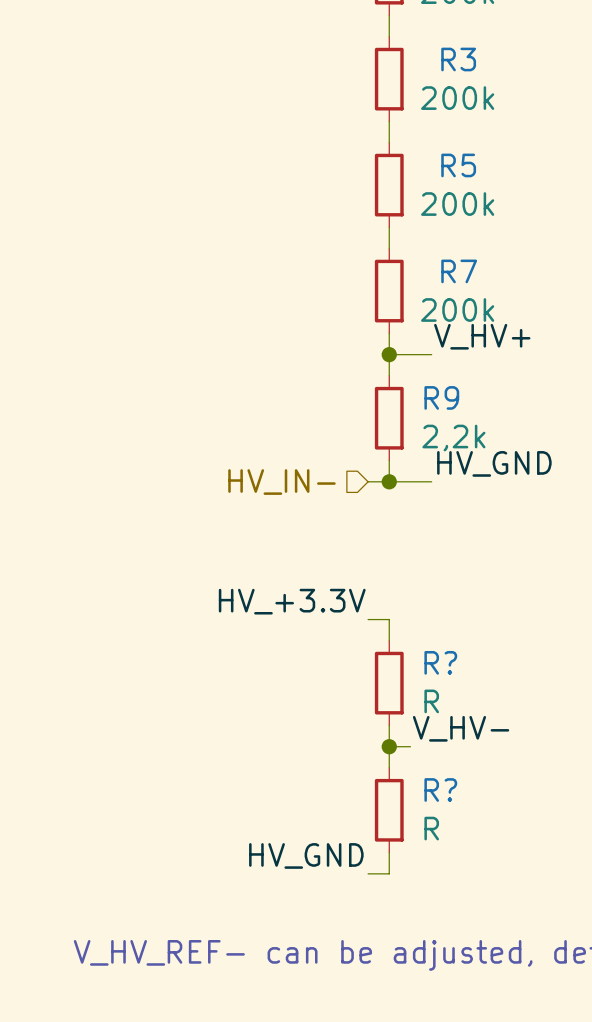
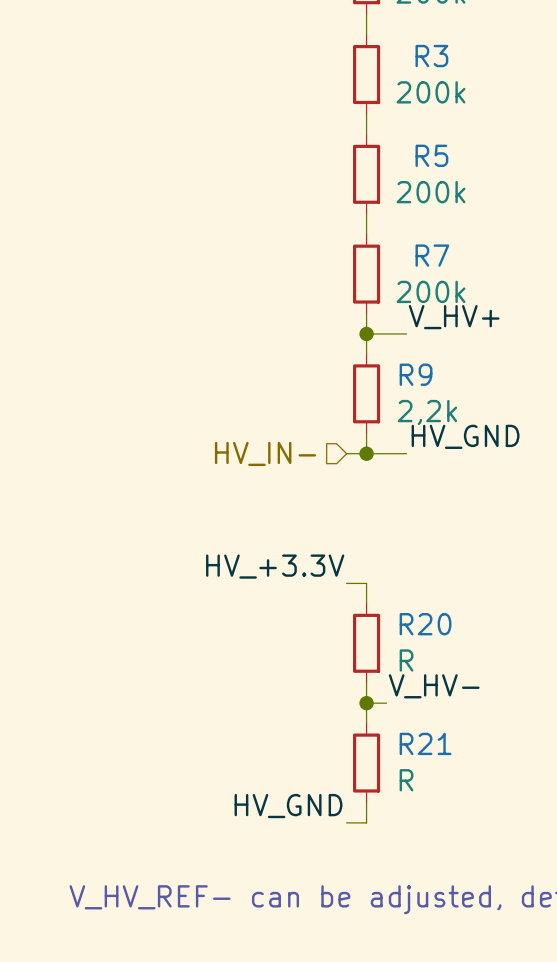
R? name: R? (440, 662) -> R20 (425, 624)
R? name: R? (440, 790) -> R21 (425, 743)

